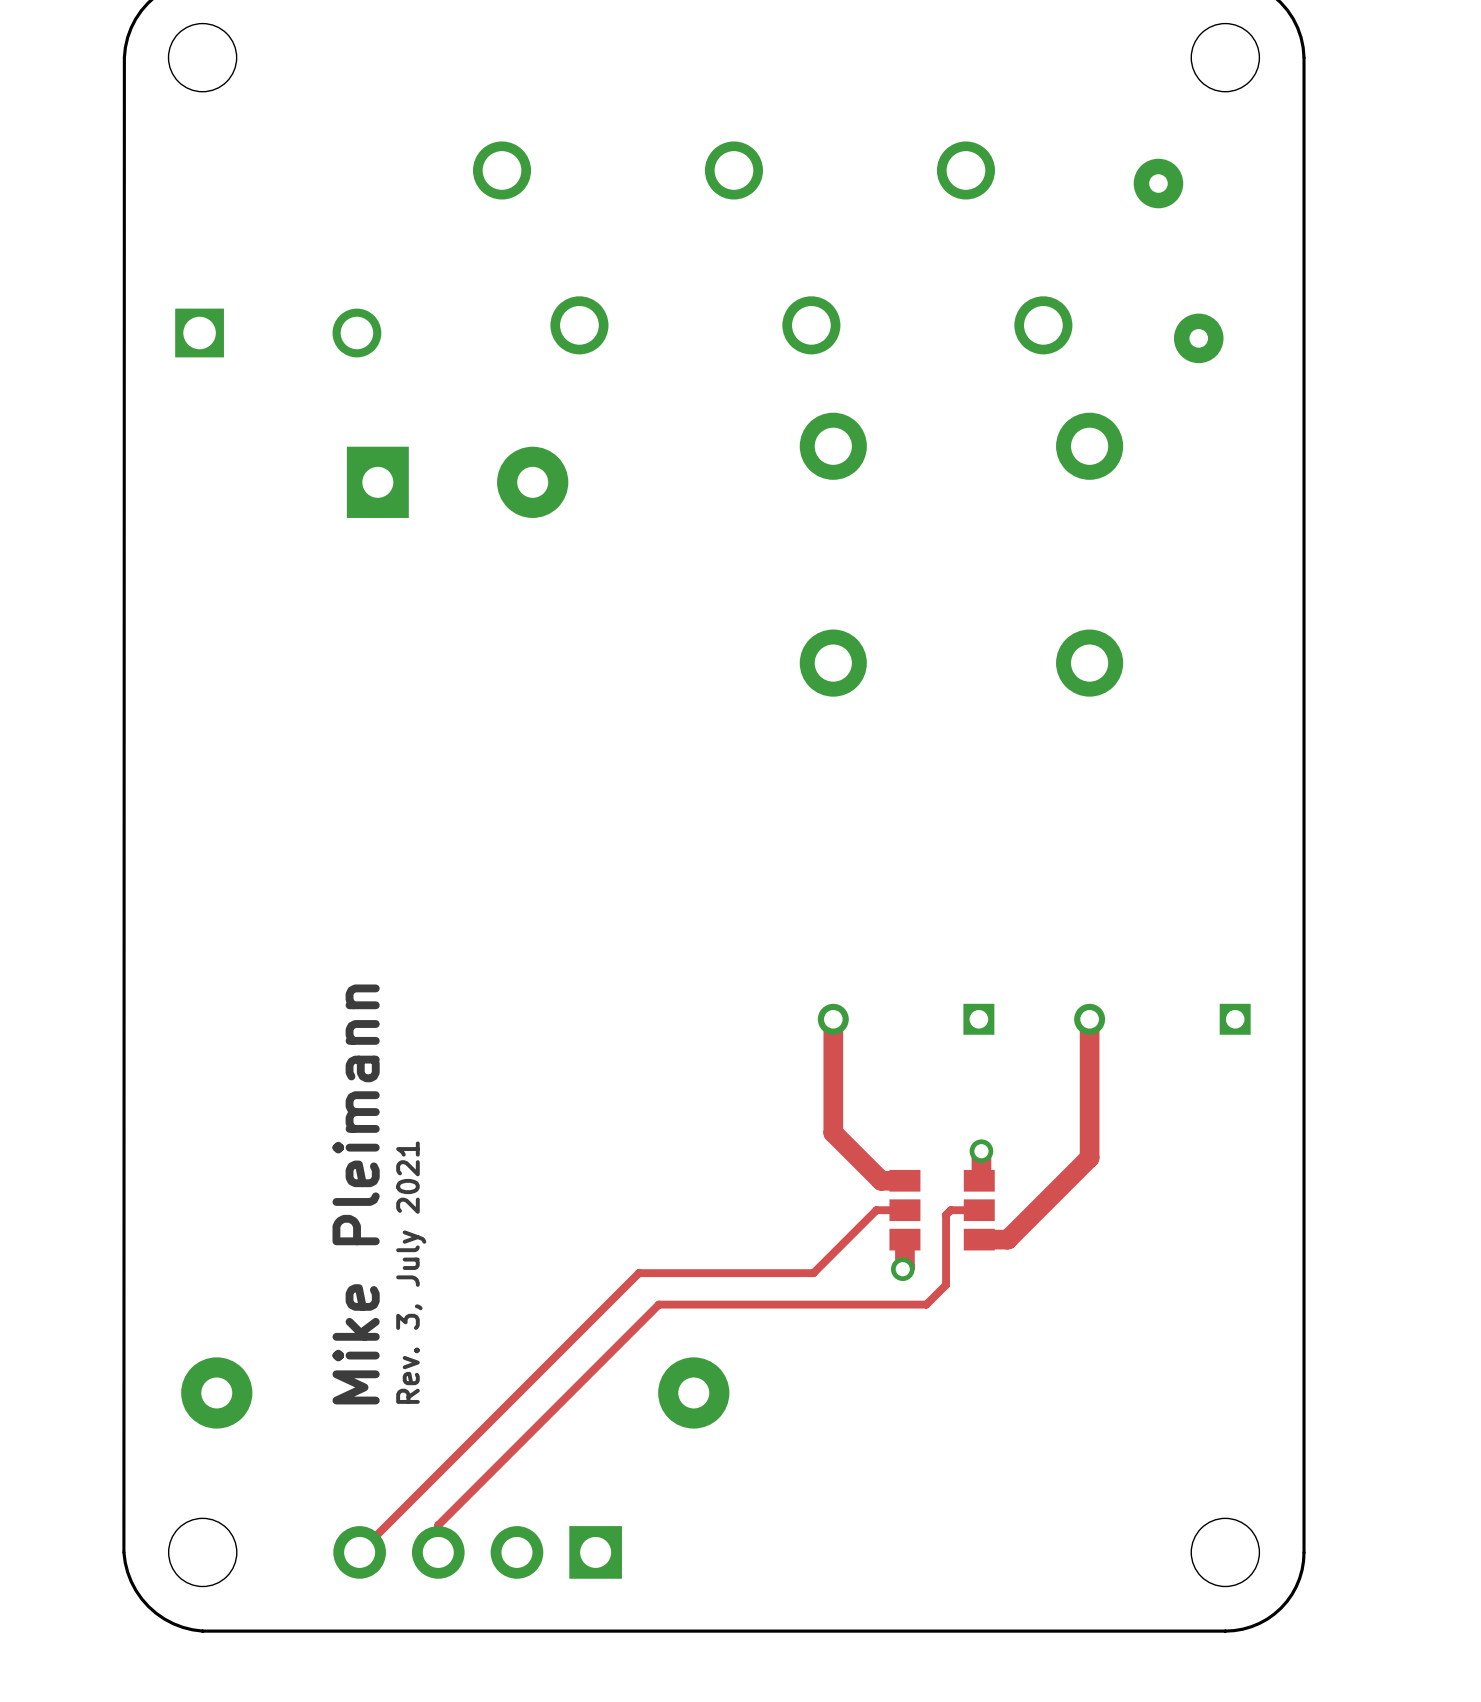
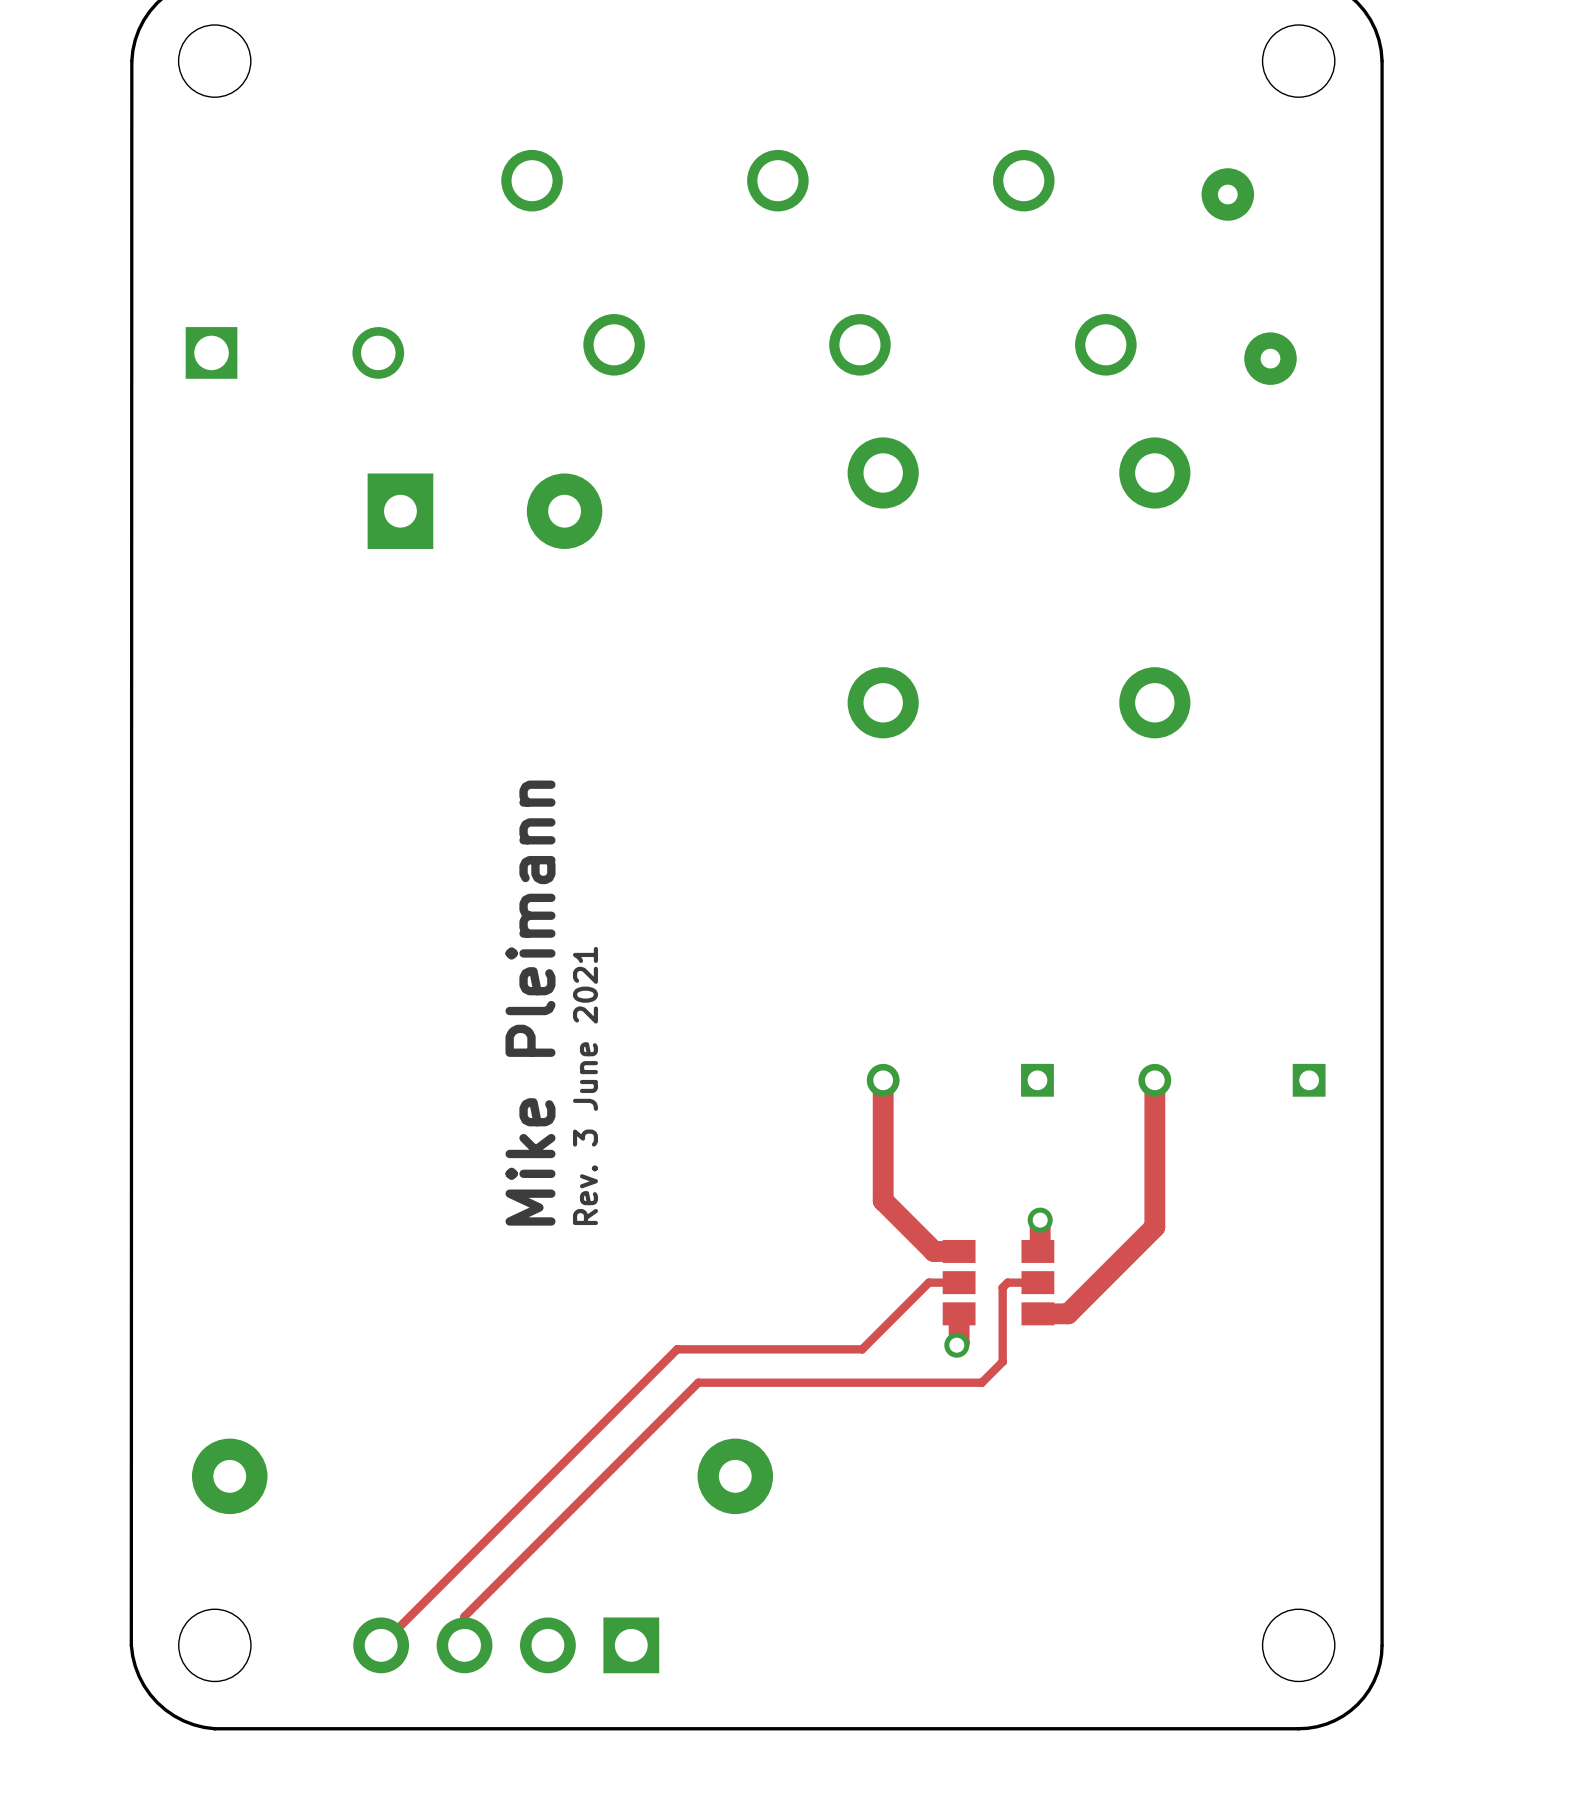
text: none -> Rev. 3 June 2021 (585, 1085)
text position: Mike Pleimann (356, 1194) -> Mike Pleimann (530, 1003)
text: Rev. 3, July 2021 (411, 1272) -> none

